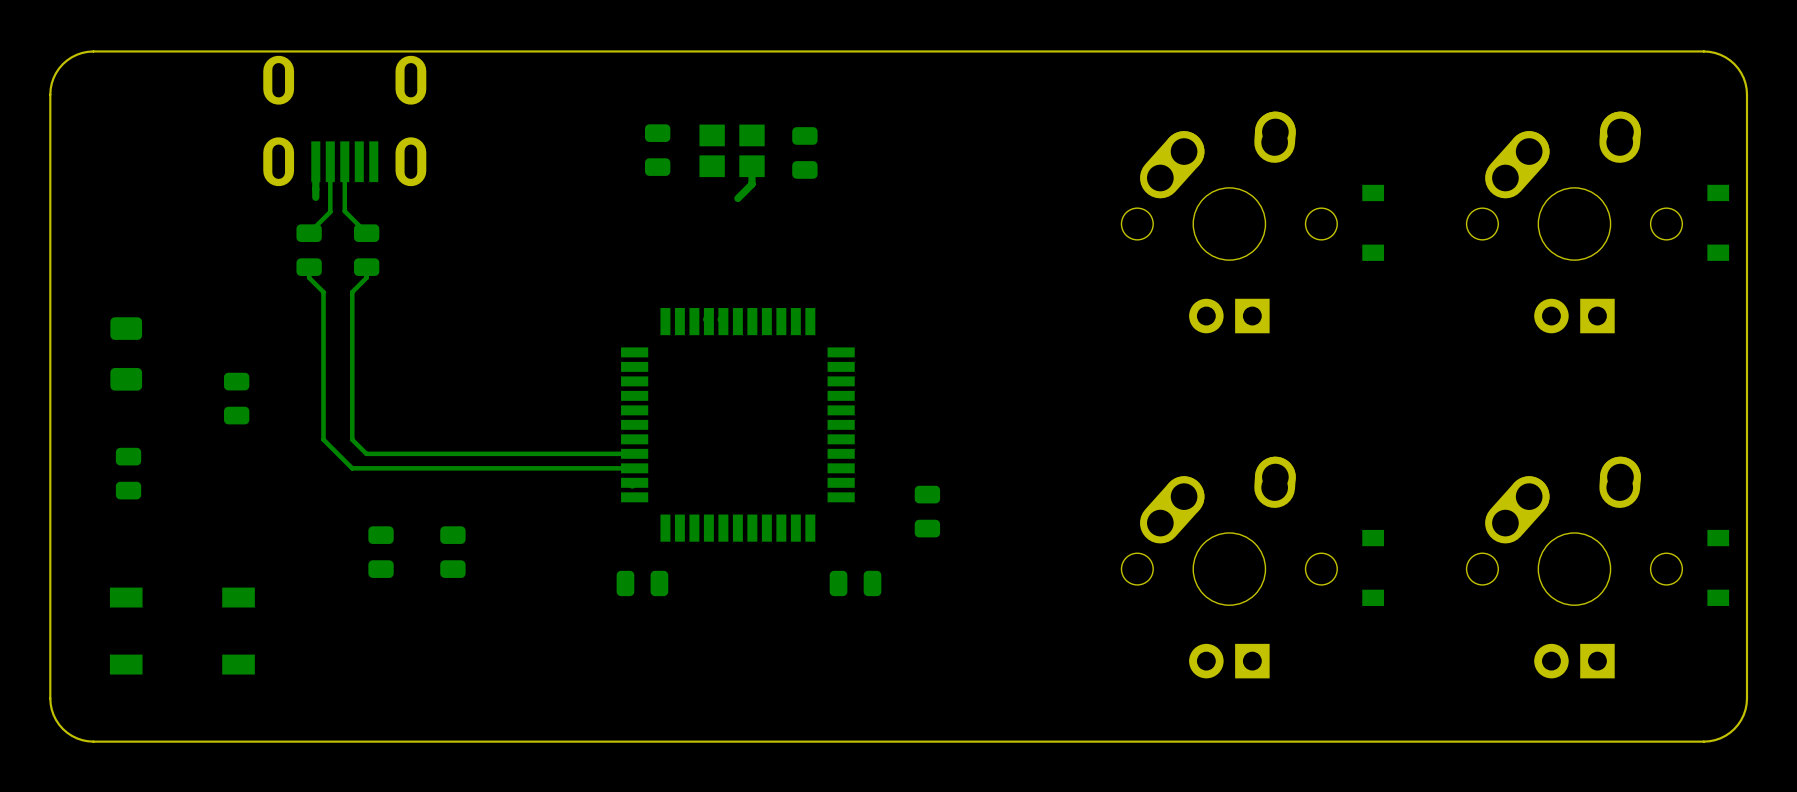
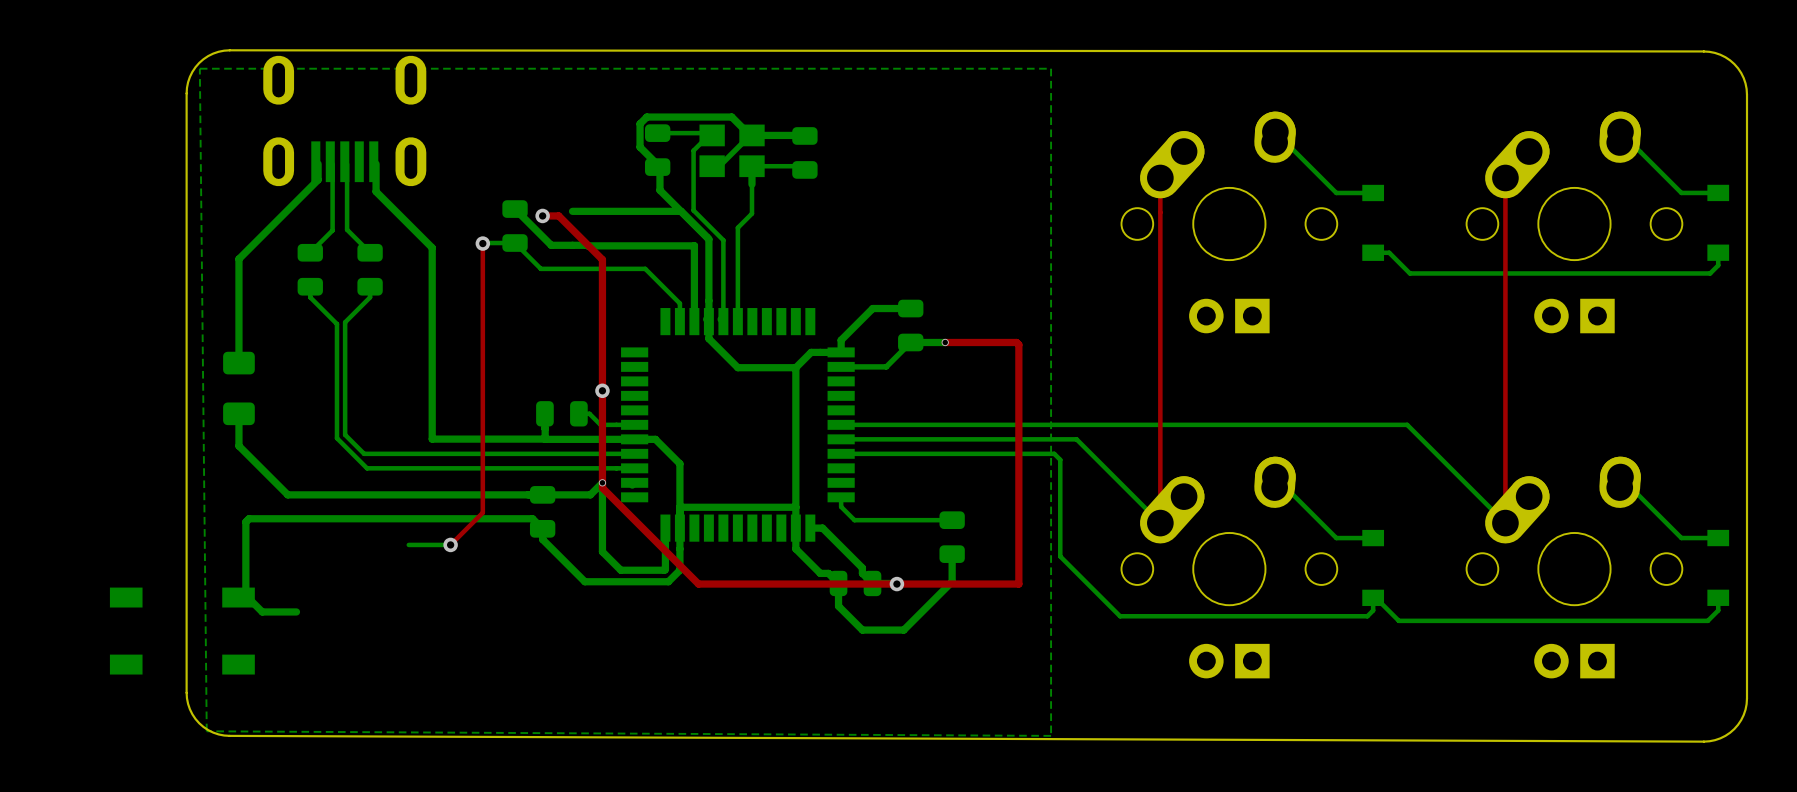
board edge: (1703, 51) (93, 51) (76, 54) (62, 64) (53, 78) (50, 94) -> none
bottom zone outline: none -> (199, 68) (1051, 68) (1051, 735) (206, 731) (199, 68)
board edge: (50, 94) (50, 698) (56, 720) (62, 729) (76, 738) (93, 741) (1703, 741) -> (1703, 51) (229, 50) (213, 53) (199, 62) (189, 76) (186, 93) (186, 692) (188, 703) (195, 719) (213, 732) (229, 735) (1703, 741)
bottom track: none -> (1620, 131) (1681, 192) (1718, 192)
bottom track: none -> (659, 133) (709, 133) (712, 135) (708, 135) (693, 150) (693, 210) (723, 240) (723, 321)
bottom track: none -> (751, 135) (800, 135)
bottom track: none -> (1274, 142) (1285, 142) (1336, 192) (1373, 192)
bottom track: (315, 161) (315, 197) -> none
bottom track: (330, 161) (330, 212) (309, 233) -> none
bottom track: none -> (318, 164) (318, 179) (238, 259) (238, 363)
bottom track: none -> (332, 164) (332, 230) (310, 252)
bottom track: none -> (347, 164) (347, 229) (370, 252)
bottom track: none -> (376, 164) (376, 191) (432, 247) (432, 439) (544, 439)
bottom track: none -> (712, 166) (719, 166) (750, 135) (731, 117) (646, 117) (640, 123) (640, 147) (659, 167) (659, 190) (708, 239) (708, 338) (737, 367) (795, 367)
bottom track: none -> (751, 166) (797, 166) (800, 169)
bottom track: (344, 173) (344, 161) (344, 211) (366, 233) -> none
top track: none -> (1160, 177) (1160, 523)
top track: none -> (1505, 177) (1505, 523)
bottom track: (751, 184) (737, 198) -> (751, 184) (751, 213) (737, 227) (737, 321)
bottom track: none -> (515, 209) (551, 245) (694, 245)
bottom track: none -> (572, 211) (681, 211)
top track: none -> (542, 215) (558, 215) (602, 259) (602, 487) (698, 584) (1018, 584) (1018, 344) (1016, 342) (945, 342)
via: none -> (542, 215)
part: none -> (515, 226)
bottom track: none -> (482, 243) (515, 243) (540, 268) (645, 268) (679, 303) (679, 321)
top track: none -> (482, 243) (482, 512) (450, 544)
via: none -> (482, 243)
bottom track: none -> (694, 245) (694, 321)
part position: (309, 250) -> (310, 269)
part position: (366, 250) -> (370, 269)
bottom track: none -> (1373, 252) (1389, 252) (1409, 273) (1710, 273) (1718, 265) (1718, 252)
bottom track: (309, 267) (309, 277) (323, 292) (323, 439) (352, 468) (367, 468) -> (310, 286) (310, 297) (336, 324) (336, 438) (367, 468)
bottom track: (366, 267) (366, 277) (352, 292) (352, 439) (366, 453) -> (370, 286) (370, 297) (345, 322) (345, 434) (364, 453) (366, 453)
bottom track: none -> (910, 308) (872, 308) (841, 340) (841, 352) (811, 352) (795, 367)
part: none -> (910, 325)
bottom track: none -> (945, 342) (910, 342) (886, 366) (841, 366)
via: none -> (945, 342)
part: (126, 353) -> none
bottom track: none -> (795, 367) (795, 548) (820, 573) (828, 573) (838, 583) (838, 606) (862, 630) (903, 630) (952, 581) (952, 554)
part footprint: [223, 372, 250, 425] -> [223, 351, 255, 426]
via: none -> (602, 390)
bottom track: none -> (238, 413) (238, 446) (287, 494) (590, 494) (602, 482) (602, 551) (620, 570) (664, 570) (665, 528)
part: none -> (561, 413)
bottom track: none -> (578, 413) (589, 413) (600, 424) (634, 424)
bottom track: none -> (841, 424) (1407, 424) (1505, 523)
bottom track: none -> (545, 428) (545, 439) (655, 439) (679, 463) (679, 570) (668, 581) (584, 581) (542, 539) (542, 528) (532, 518) (249, 518) (245, 521) (245, 595) (262, 611) (296, 611)
bottom track: none -> (841, 439) (1076, 439) (1160, 523)
bottom track: none -> (841, 453) (1054, 453) (1060, 459) (1060, 556) (1120, 616) (1367, 616) (1373, 610) (1373, 597)
part: (128, 473) -> none
bottom track: none -> (1275, 477) (1336, 538) (1373, 538)
bottom track: none -> (1620, 477) (1681, 538) (1718, 538)
via: none -> (602, 482)
bottom track: none -> (841, 497) (841, 506) (854, 520) (952, 520)
bottom track: none -> (679, 507) (795, 507)
part: none -> (542, 511)
part position: (927, 511) -> (952, 537)
bottom track: none -> (810, 528) (822, 528) (862, 567) (862, 573) (872, 583) (896, 584)
bottom track: none -> (408, 544) (450, 544)
via: none -> (450, 544)
part: (381, 552) -> none
part: (452, 552) -> none
part: (642, 583) -> none
via: none -> (896, 584)
bottom track: none -> (1375, 597) (1398, 620) (1707, 620) (1718, 610) (1718, 597)

